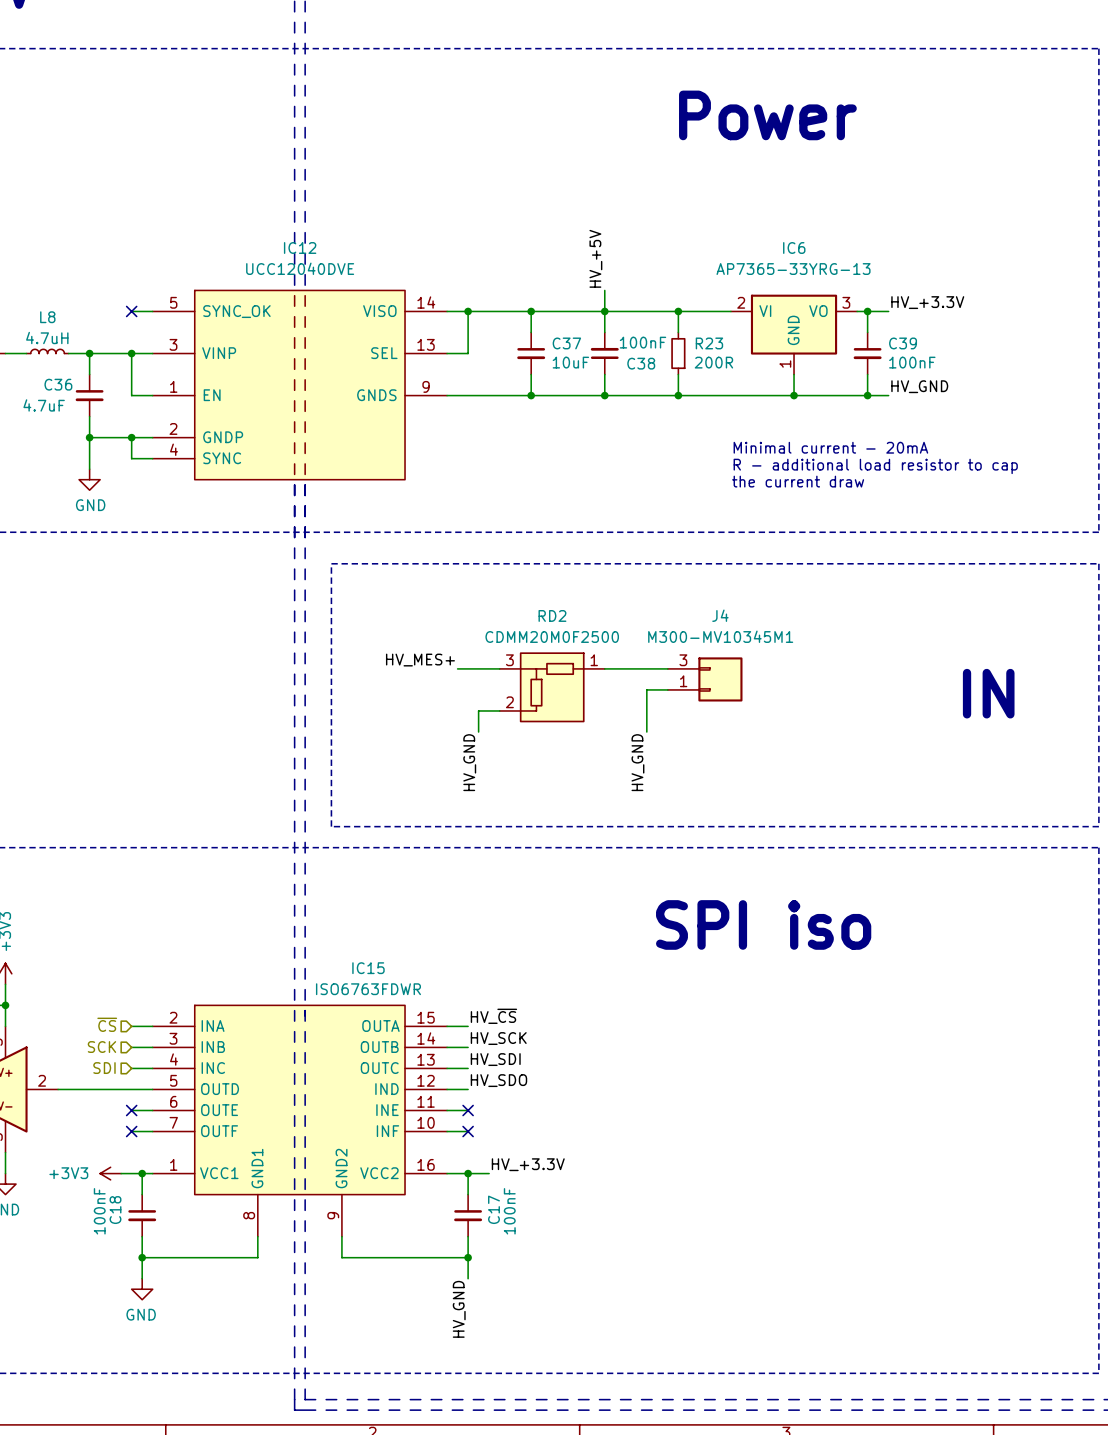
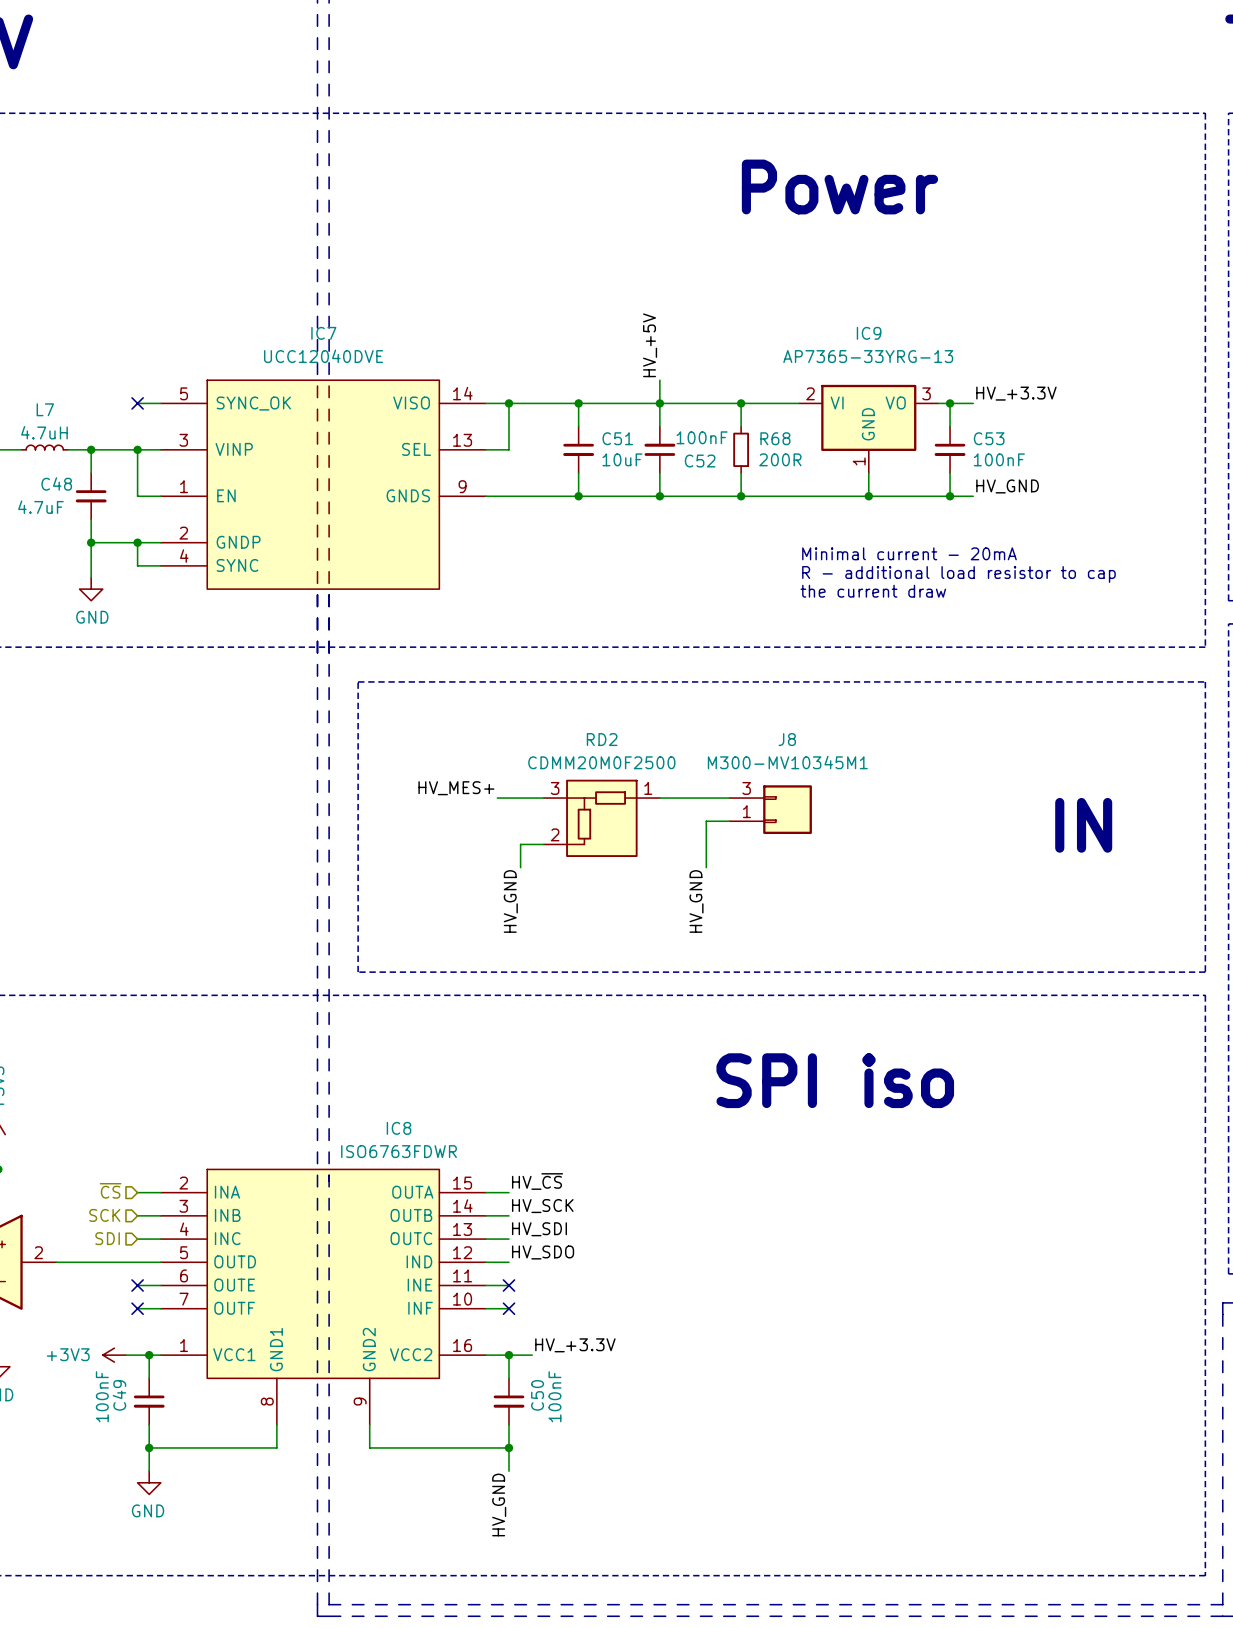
IC12 name: IC12 (300, 248) -> IC7 (323, 333)
IC6 name: IC6 (794, 248) -> IC9 (869, 333)
L8 name: L8 (47, 317) -> L7 (45, 409)
C37 name: C37 (566, 343) -> C51 (617, 438)
R23 name: R23 (709, 343) -> R68 (775, 438)
C39 name: C39 (903, 343) -> C53 (989, 438)
C38 name: C38 (641, 363) -> C52 (700, 461)
C36 name: C36 (58, 384) -> C48 (56, 483)
J4 name: J4 (720, 615) -> J8 (787, 739)
IC15 name: IC15 (368, 968) -> IC8 (399, 1128)
C17 name: C17 (493, 1209) -> C50 (537, 1395)
C18 name: C18 (115, 1210) -> C49 (119, 1395)

